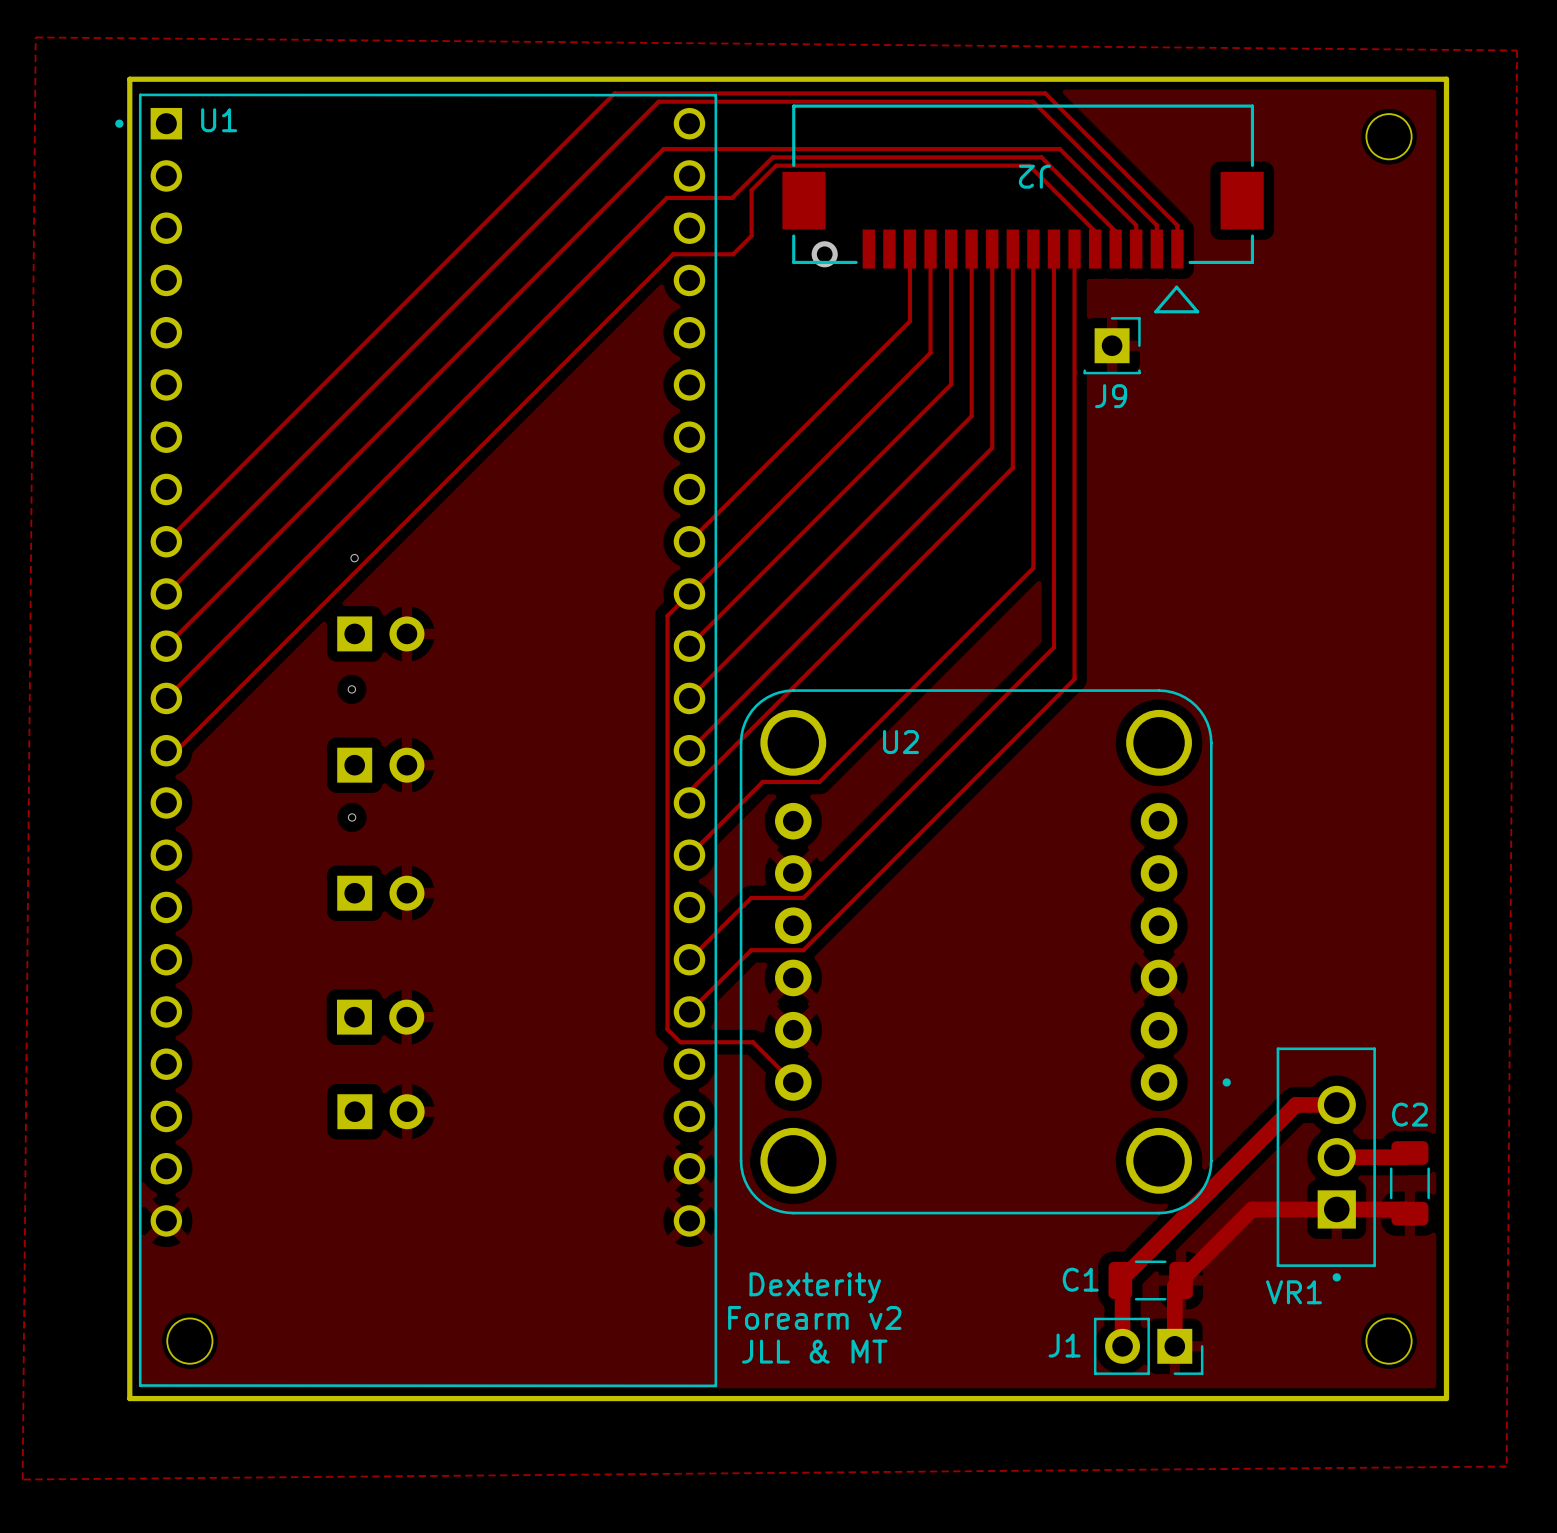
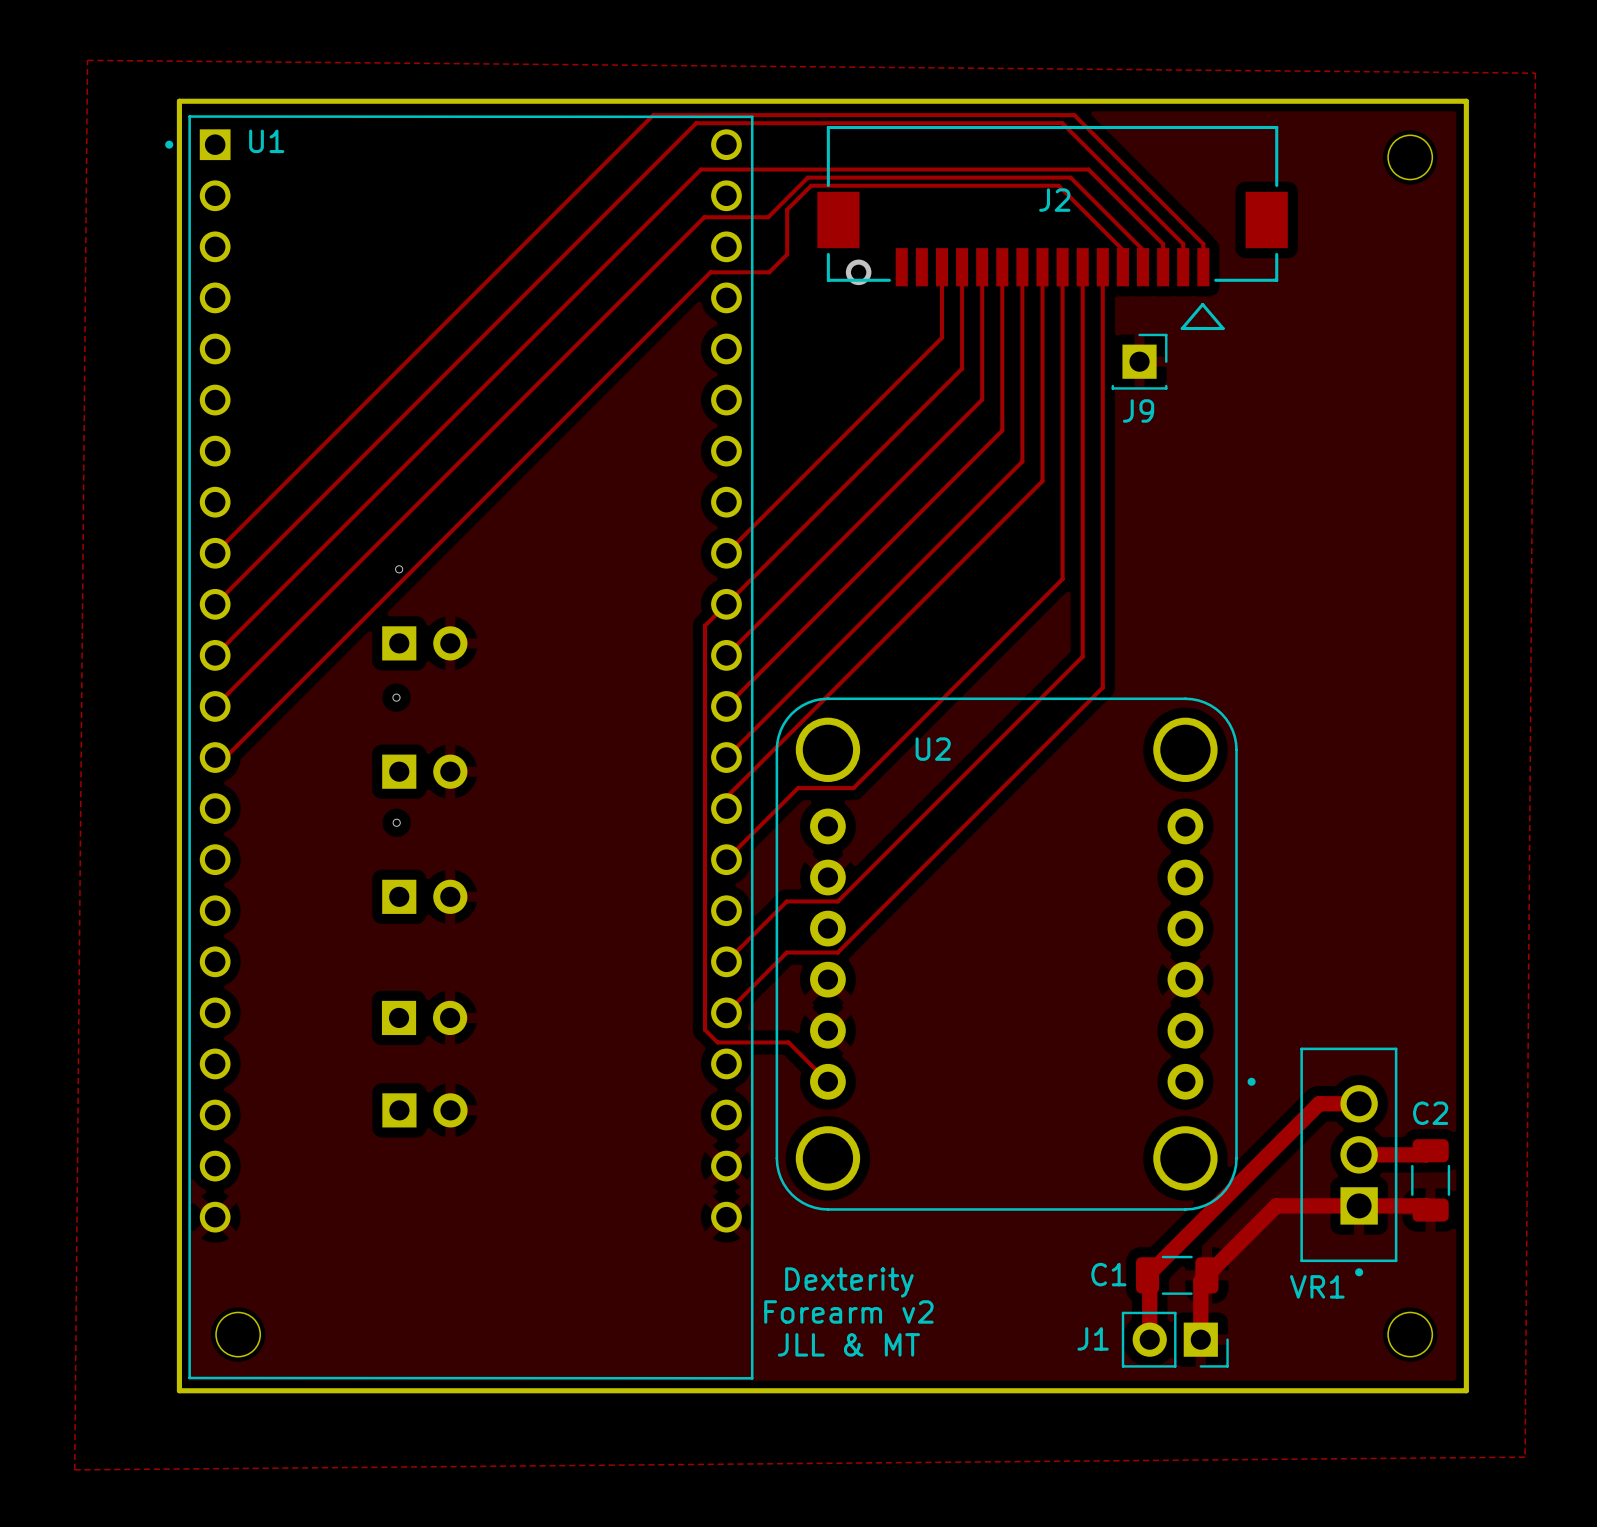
J2 name rotation: 0° (1034, 176) -> 180° (1054, 200)

